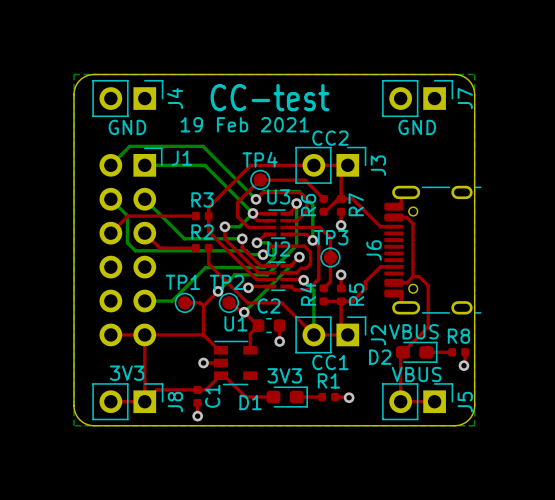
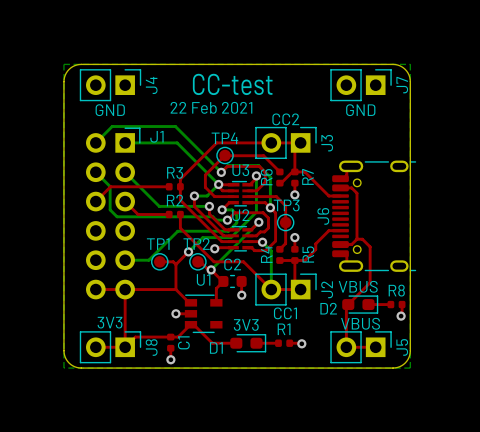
text: 19 Feb 2021 (244, 124) -> 22 Feb 2021 (211, 107)

